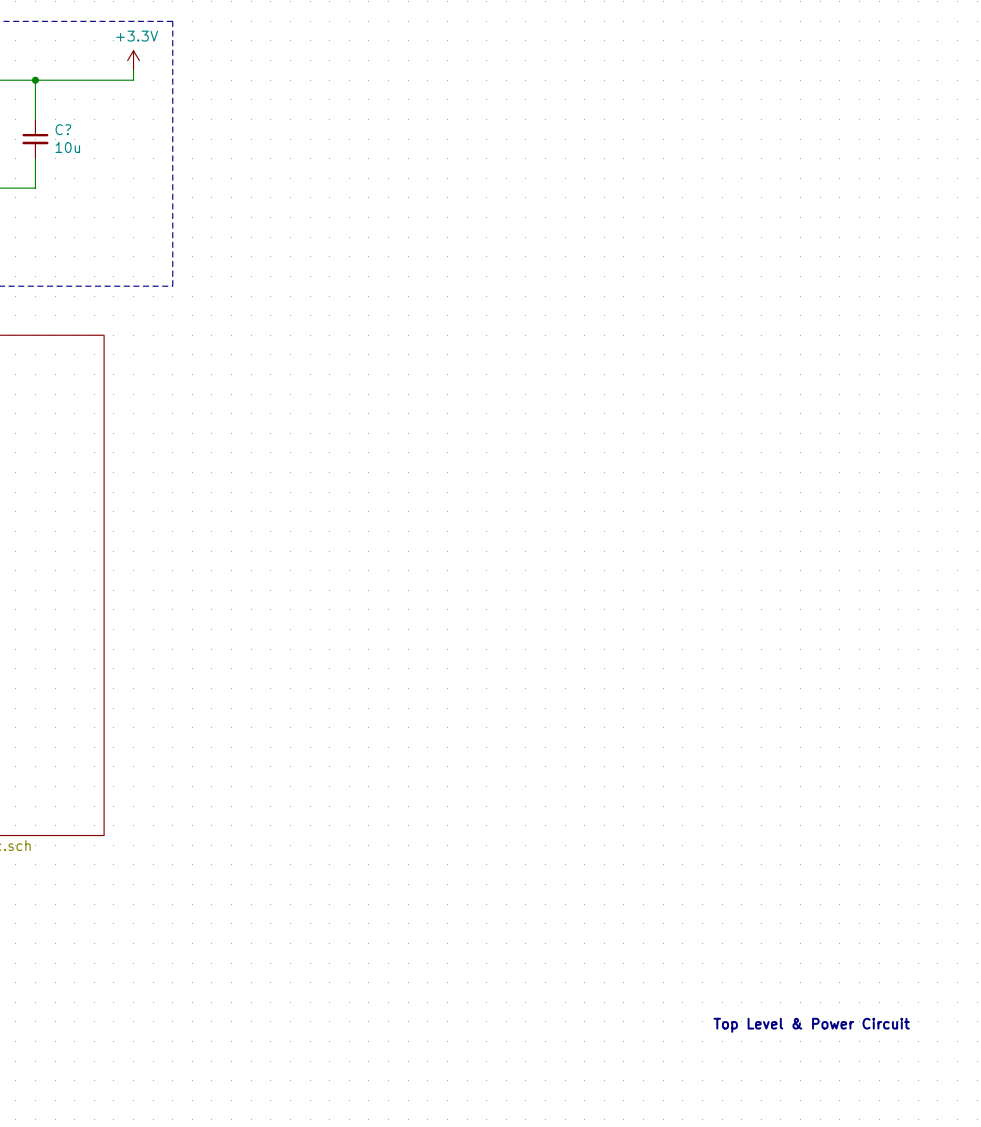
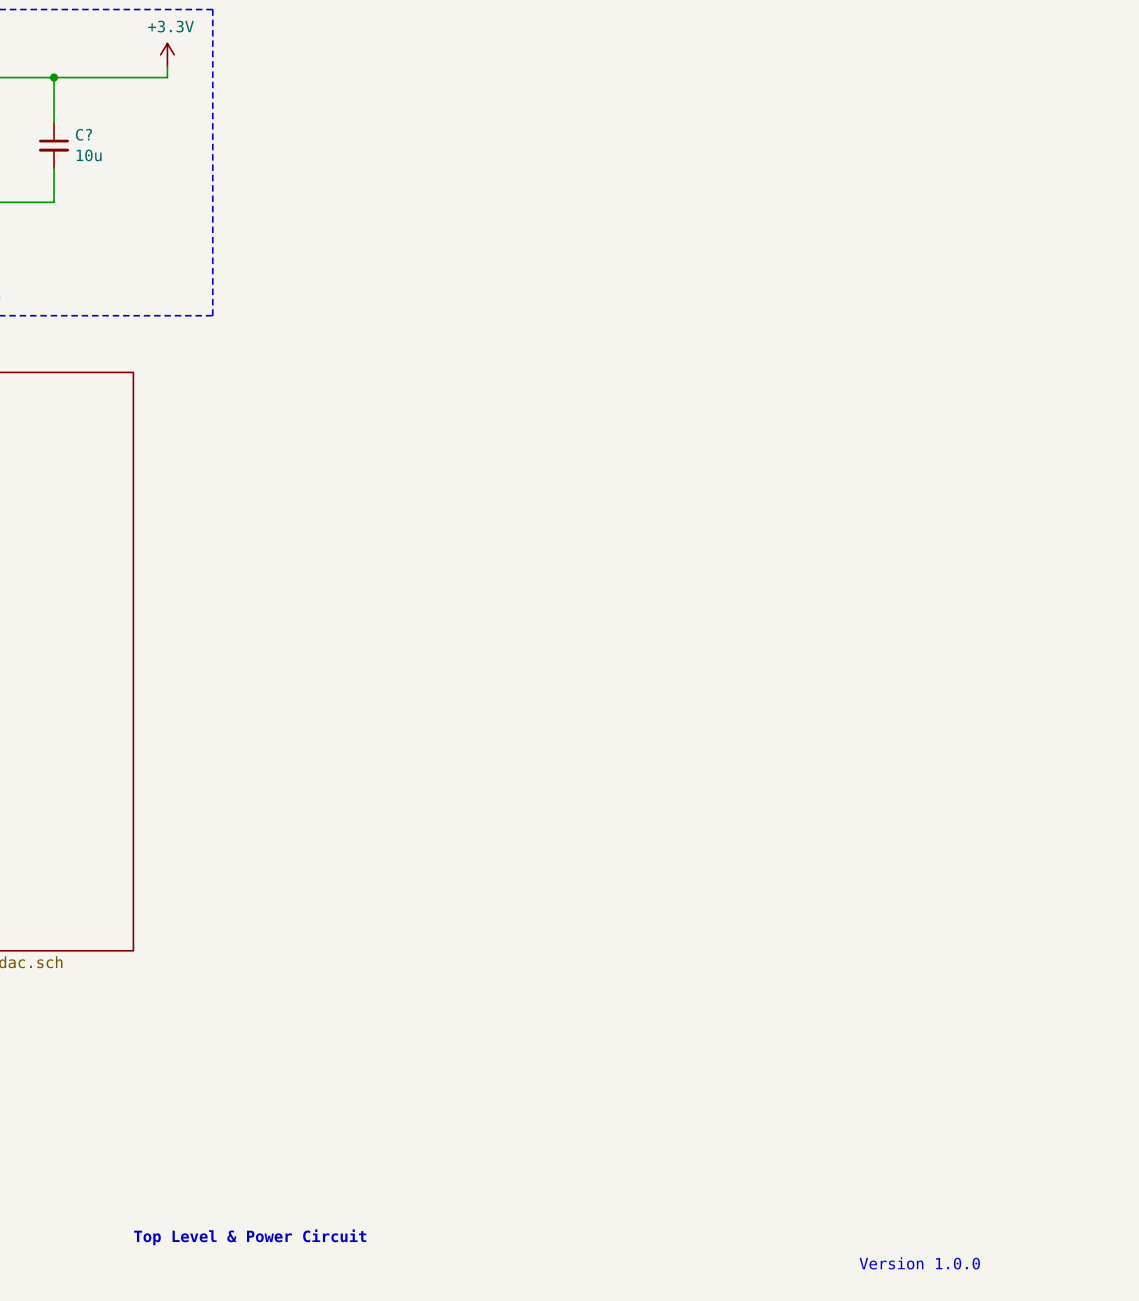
text: Top Level & Power Circuit (811, 1025) -> none
text: none -> Top Level & Power Circuit (250, 1237)
text: none -> Version 1.0.0 (919, 1263)

